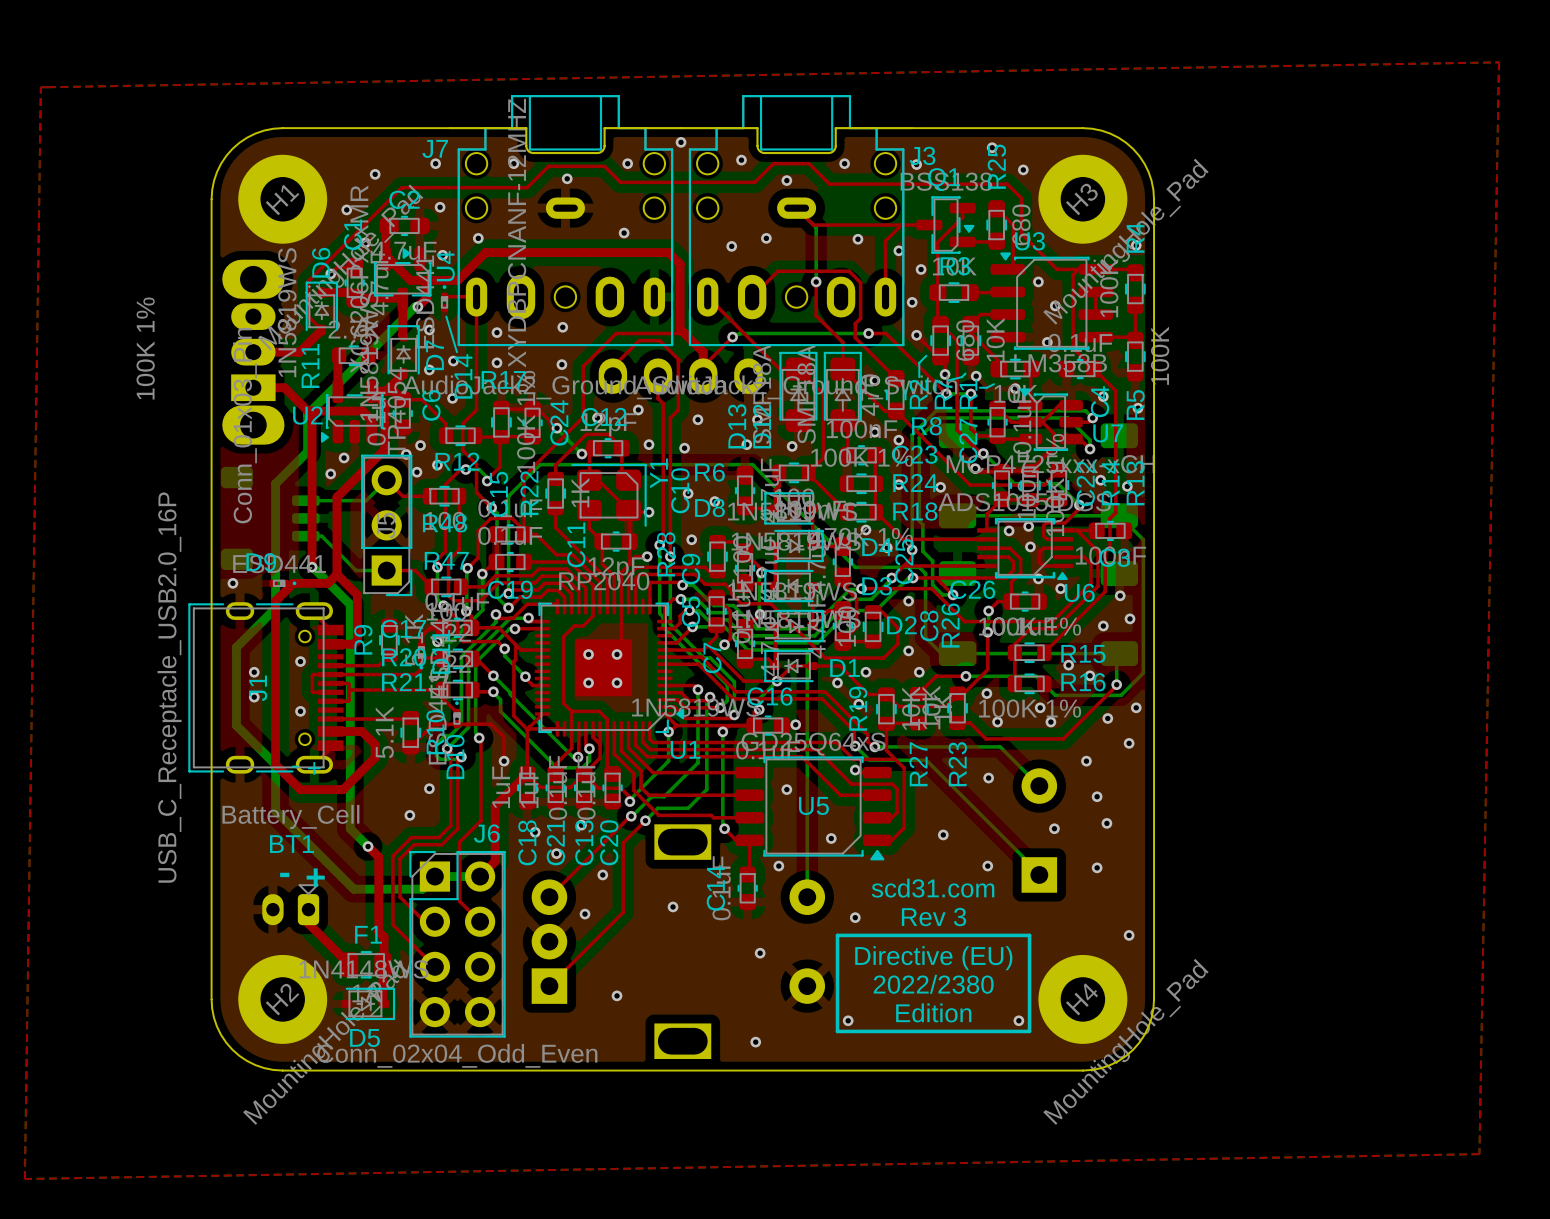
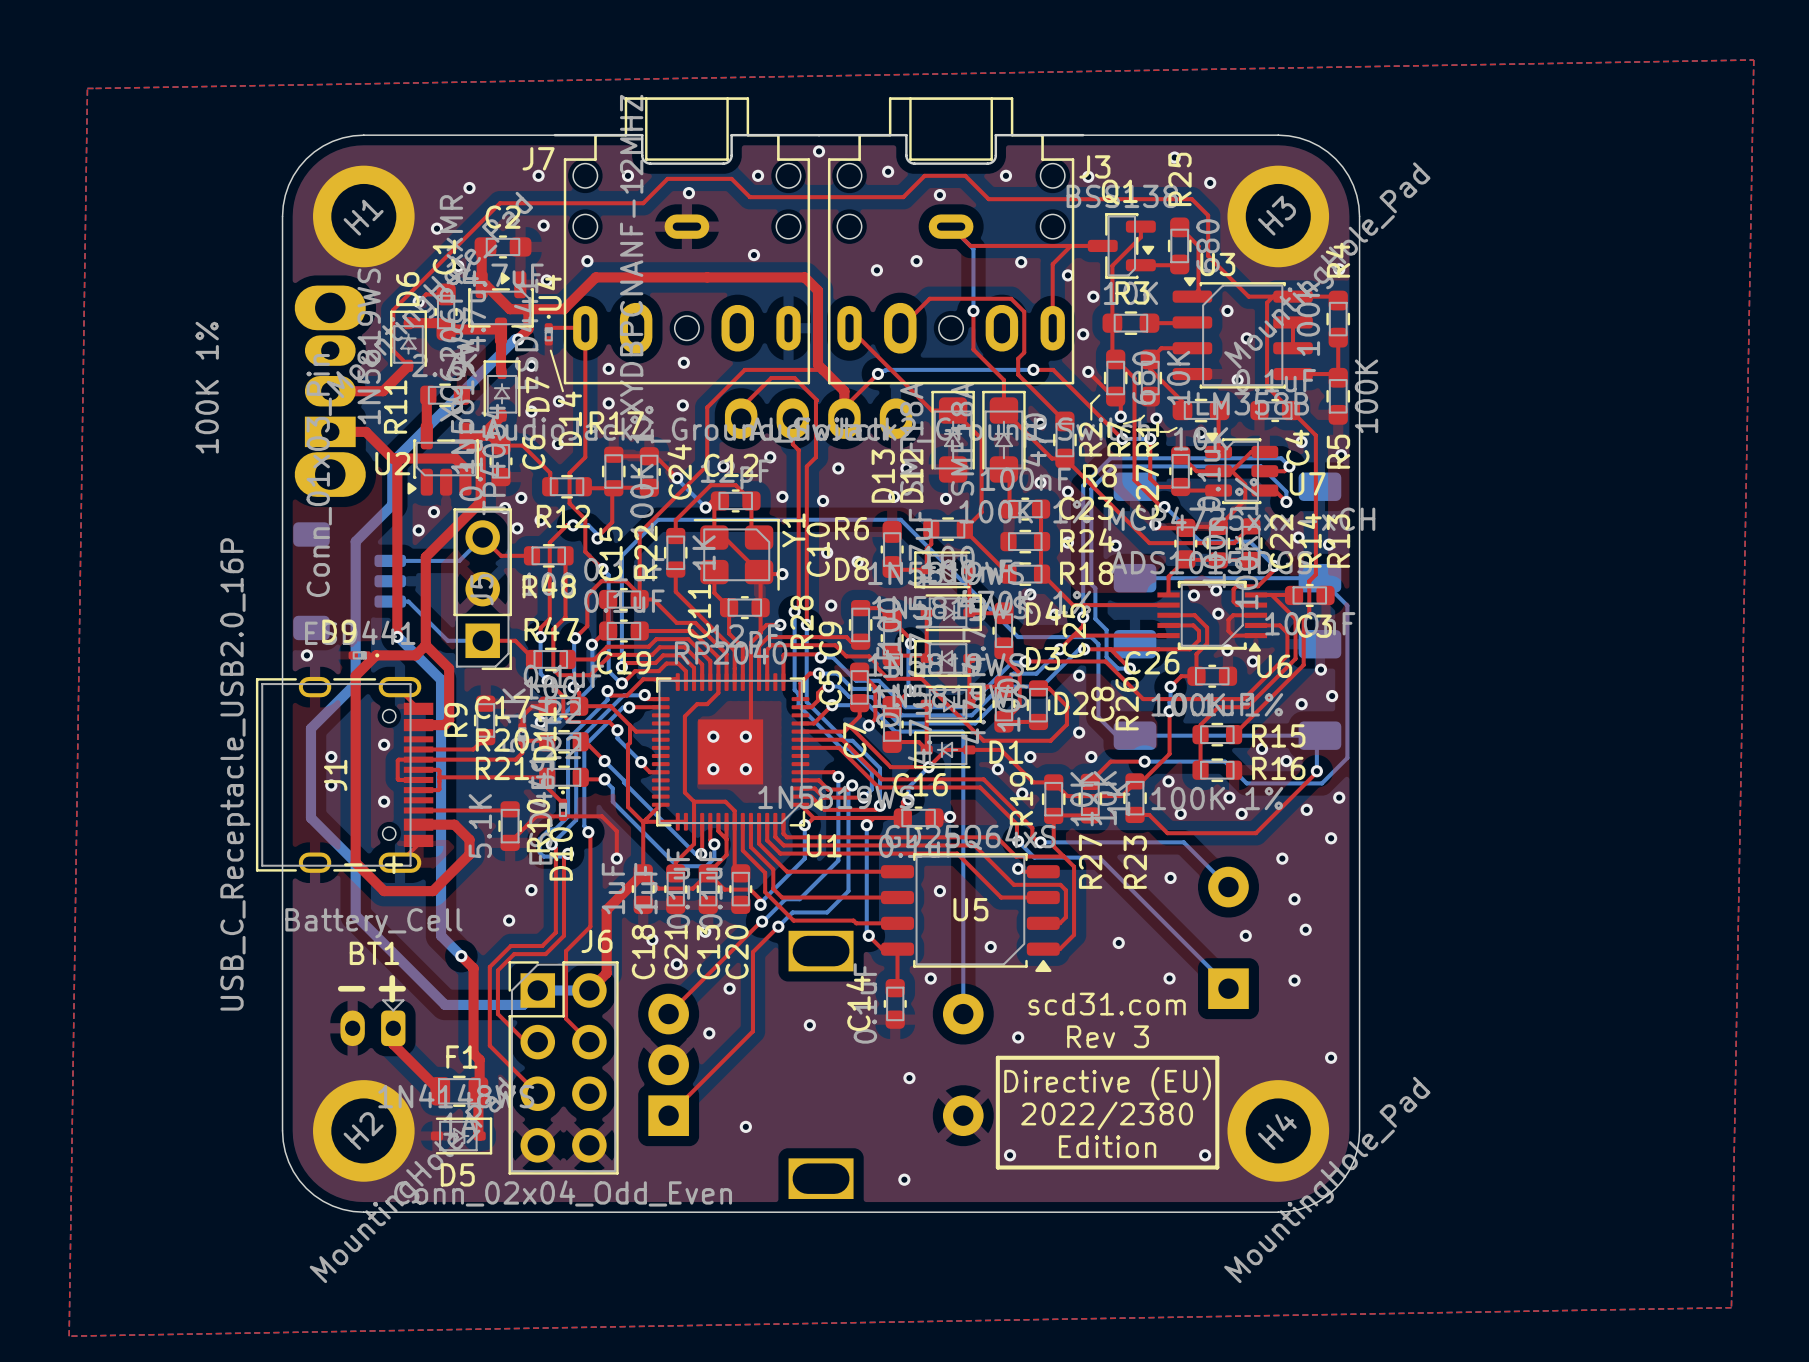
H1 footprint: [238, 154, 328, 244] -> [313, 165, 415, 268]
H3 footprint: [1038, 154, 1128, 244] -> [1227, 165, 1330, 268]
H2 footprint: [238, 954, 328, 1044] -> [313, 1080, 415, 1182]
H4 footprint: [1038, 954, 1128, 1044] -> [1227, 1080, 1330, 1182]

